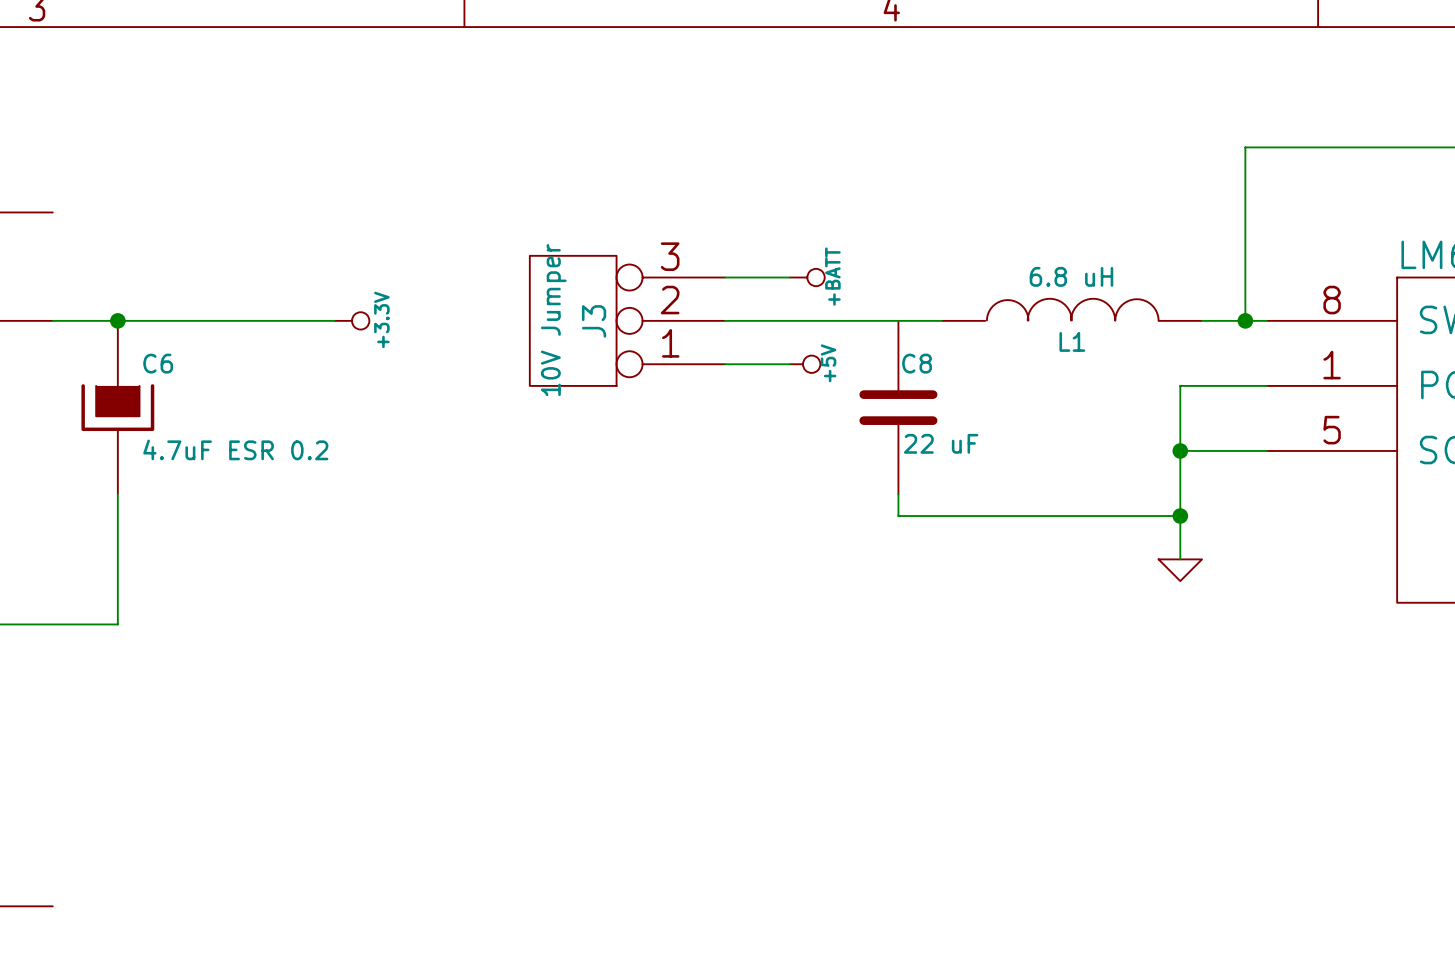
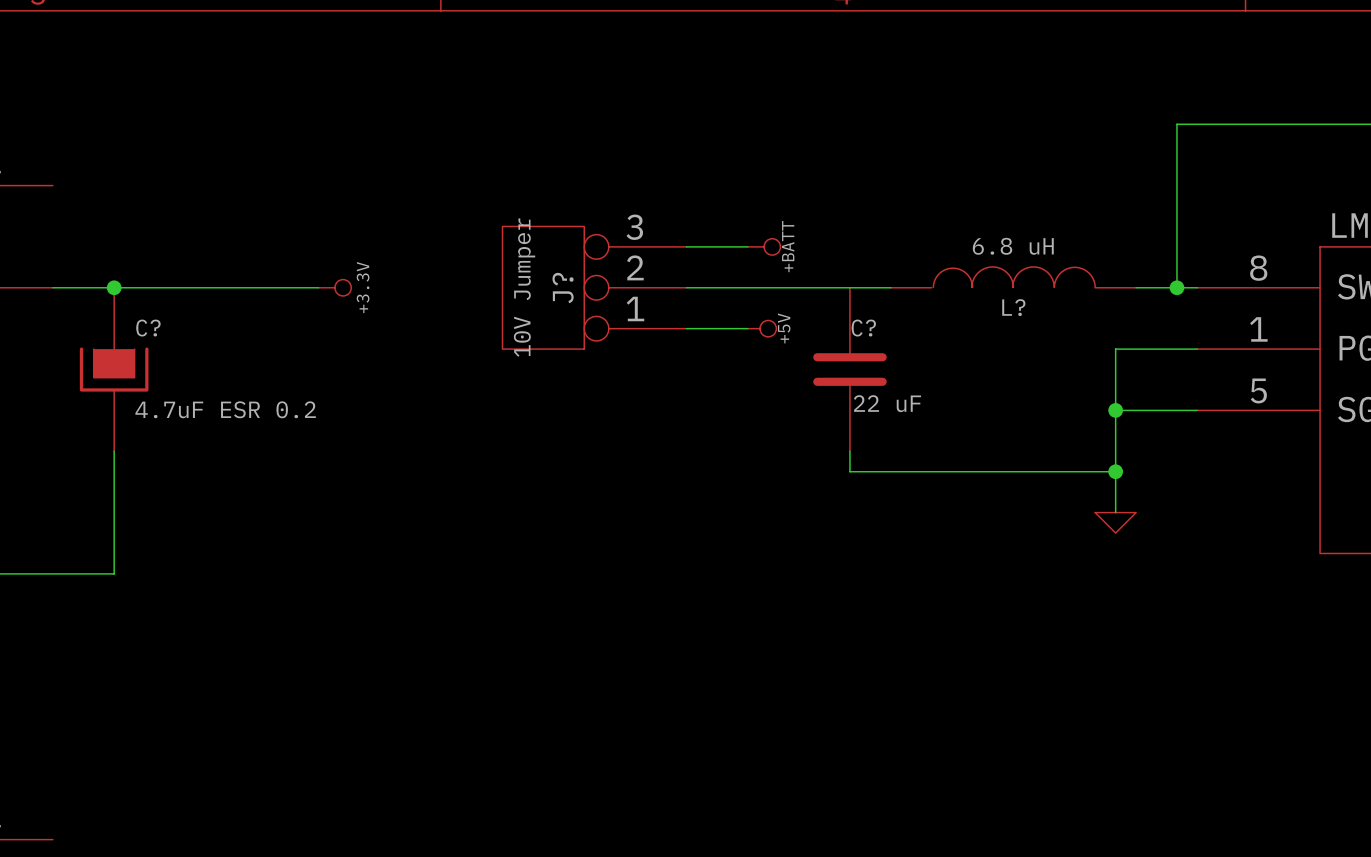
J3 name: J3 (594, 321) -> J? (563, 288)
L1 name: L1 (1072, 341) -> L? (1013, 307)
C6 name: C6 (158, 363) -> C? (148, 328)
C8 name: C8 (917, 363) -> C? (863, 328)

